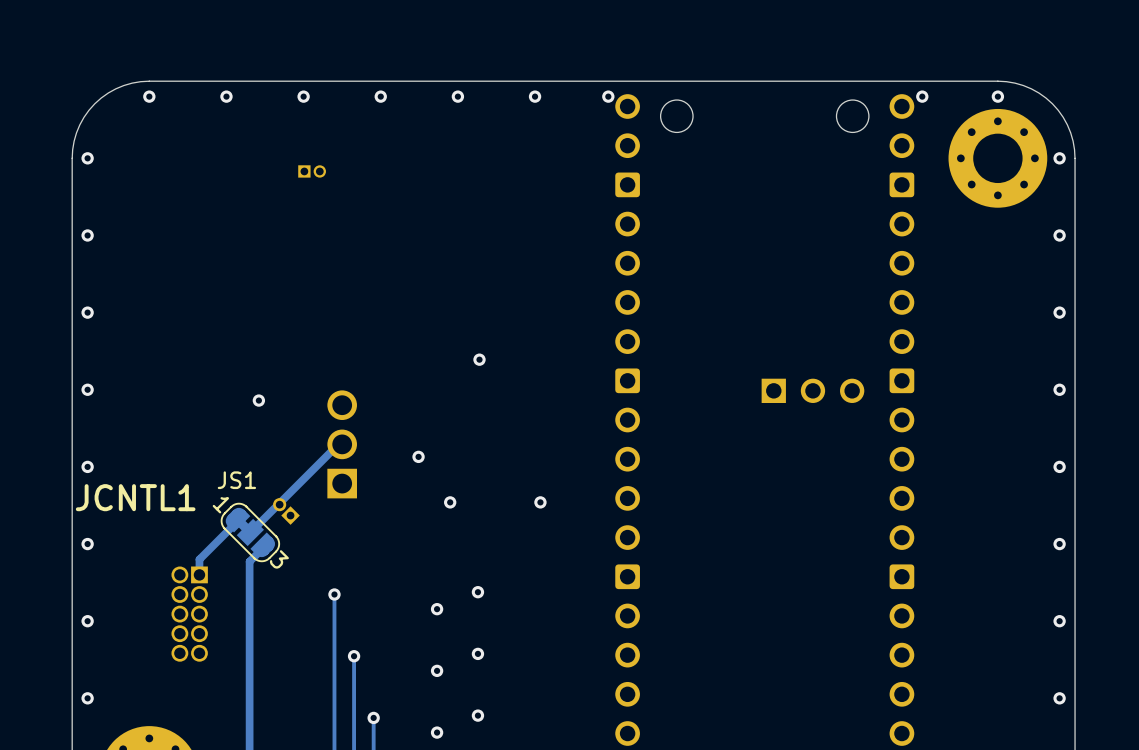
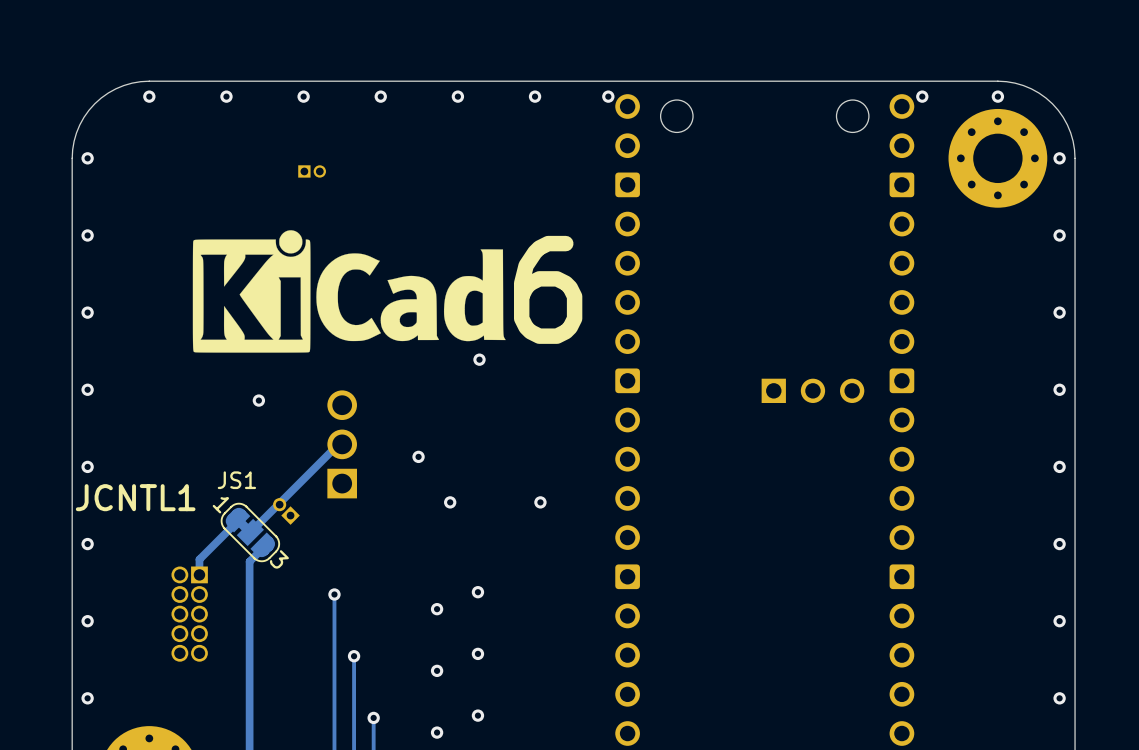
drawing: none -> [192, 230, 506, 353]
text: none -> 6 (548, 289)

